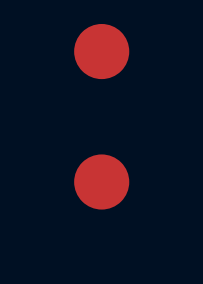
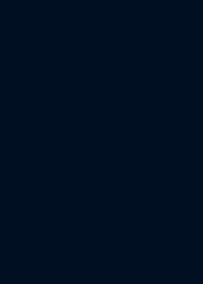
part: (101, 51) -> none
part: (101, 182) -> none

